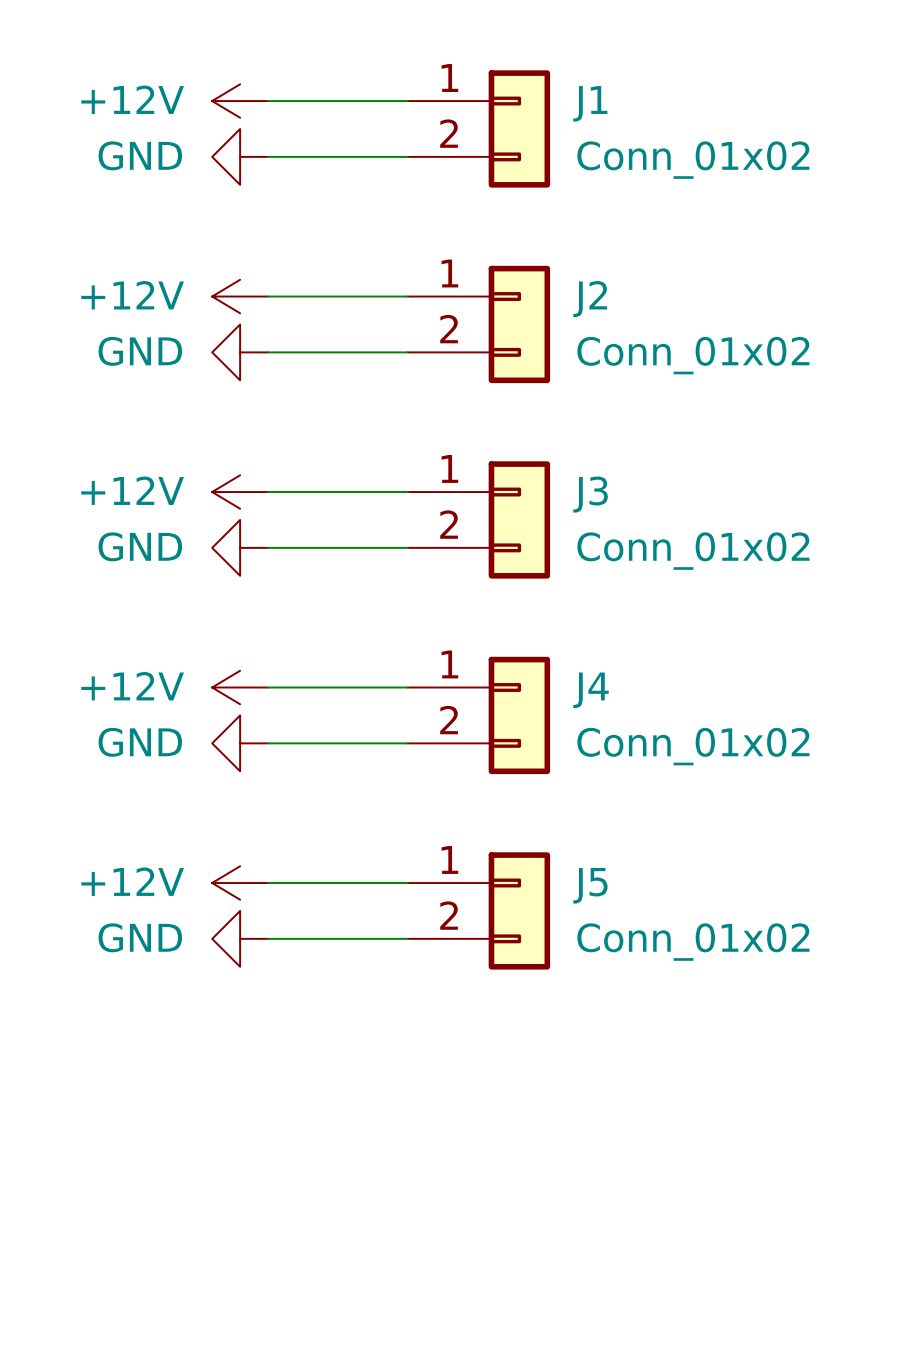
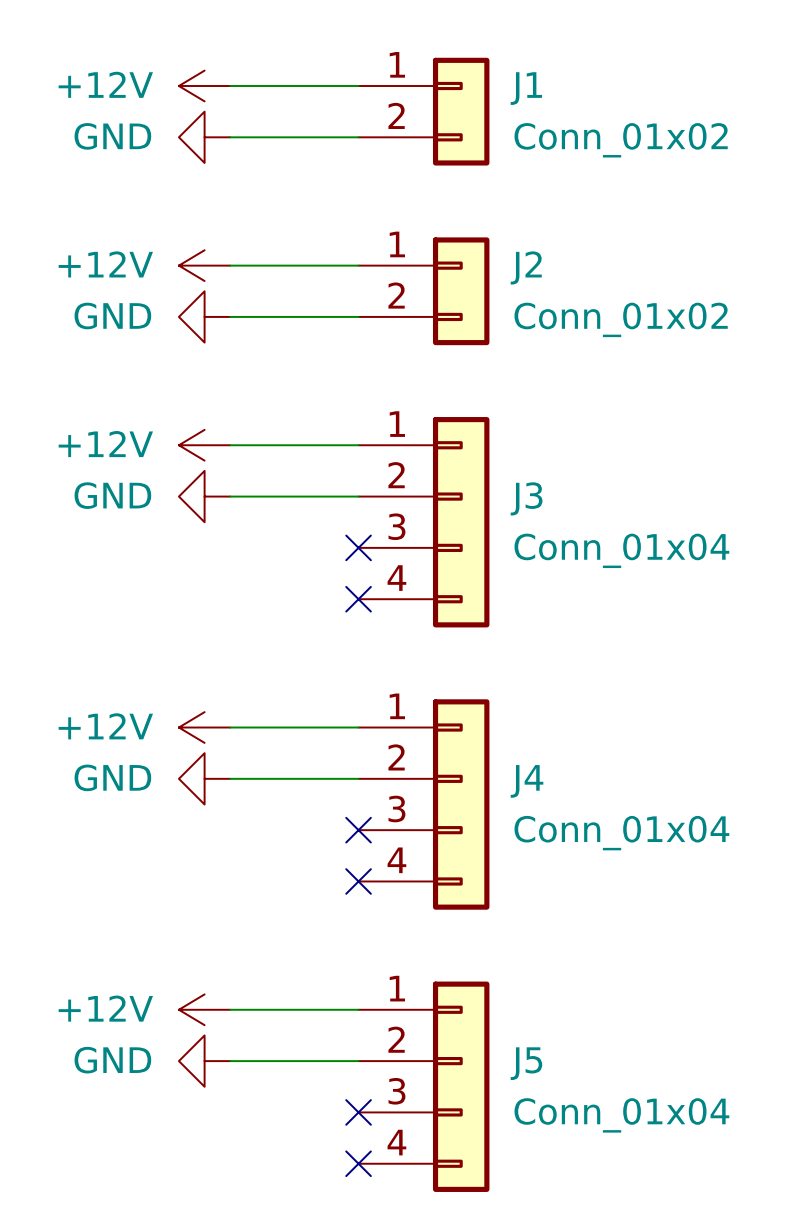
J3 symbol: [407, 461, 551, 579] -> [358, 417, 490, 628]
J3 value: Conn_01x02 (693, 551) -> Conn_01x04 (621, 550)
no-connect mark: none -> (358, 547)
J4 symbol: [407, 656, 551, 775] -> [358, 699, 490, 910]
no-connect mark: none -> (358, 599)
power symbol: +12V (240, 687) -> none
wire: (268, 687) (407, 687) -> (230, 1009) (358, 1009)
power symbol: GND (240, 743) -> none
wire: (268, 743) (407, 743) -> (230, 1061) (358, 1061)
J4 value: Conn_01x02 (693, 746) -> Conn_01x04 (621, 833)
power symbol: none -> +12V (204, 727)
J5 symbol: [407, 852, 551, 970] -> [358, 981, 490, 1192]
power symbol: none -> GND (204, 778)
power symbol: +12V (240, 883) -> none
wire: (268, 883) (407, 883) -> (230, 727) (358, 727)
no-connect mark: none -> (358, 830)
power symbol: GND (240, 938) -> none
wire: (268, 938) (407, 938) -> (230, 778) (358, 778)
J5 value: Conn_01x02 (693, 942) -> Conn_01x04 (621, 1115)
no-connect mark: none -> (358, 881)
power symbol: none -> +12V (204, 1009)
power symbol: none -> GND (204, 1061)
no-connect mark: none -> (358, 1112)
no-connect mark: none -> (358, 1163)

